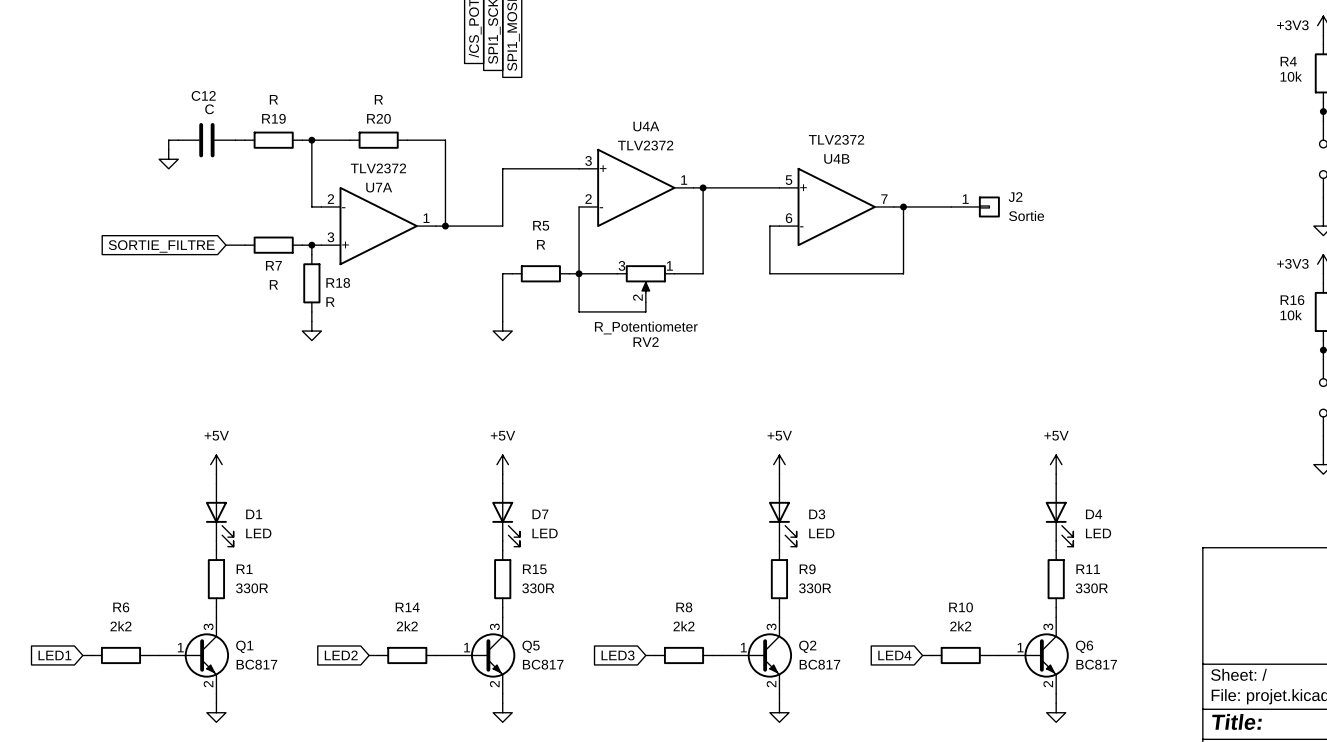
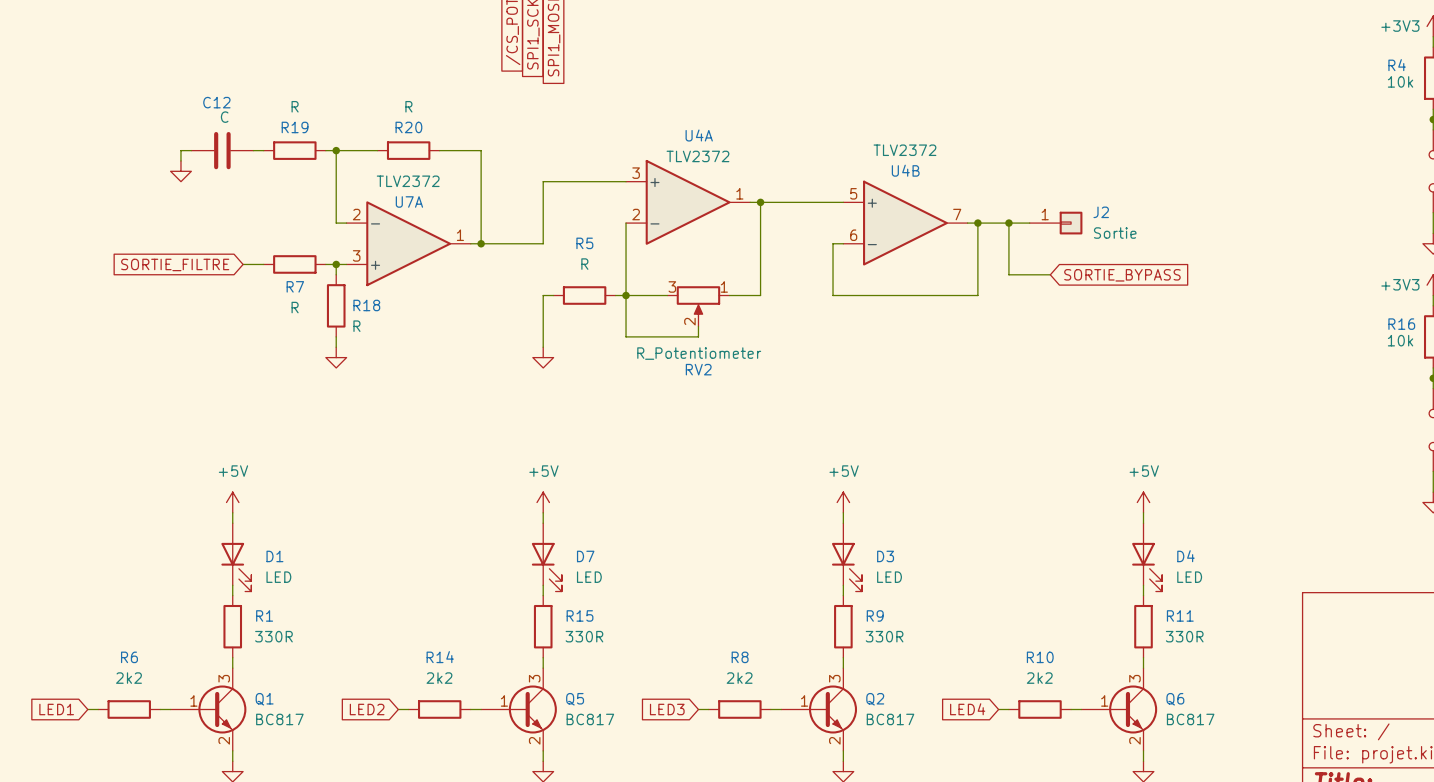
wire: none -> (1008, 223) (1008, 274) (1050, 274)
junction: none -> (1008, 223)
global label: none -> SORTIE_BYPASS (1122, 275)

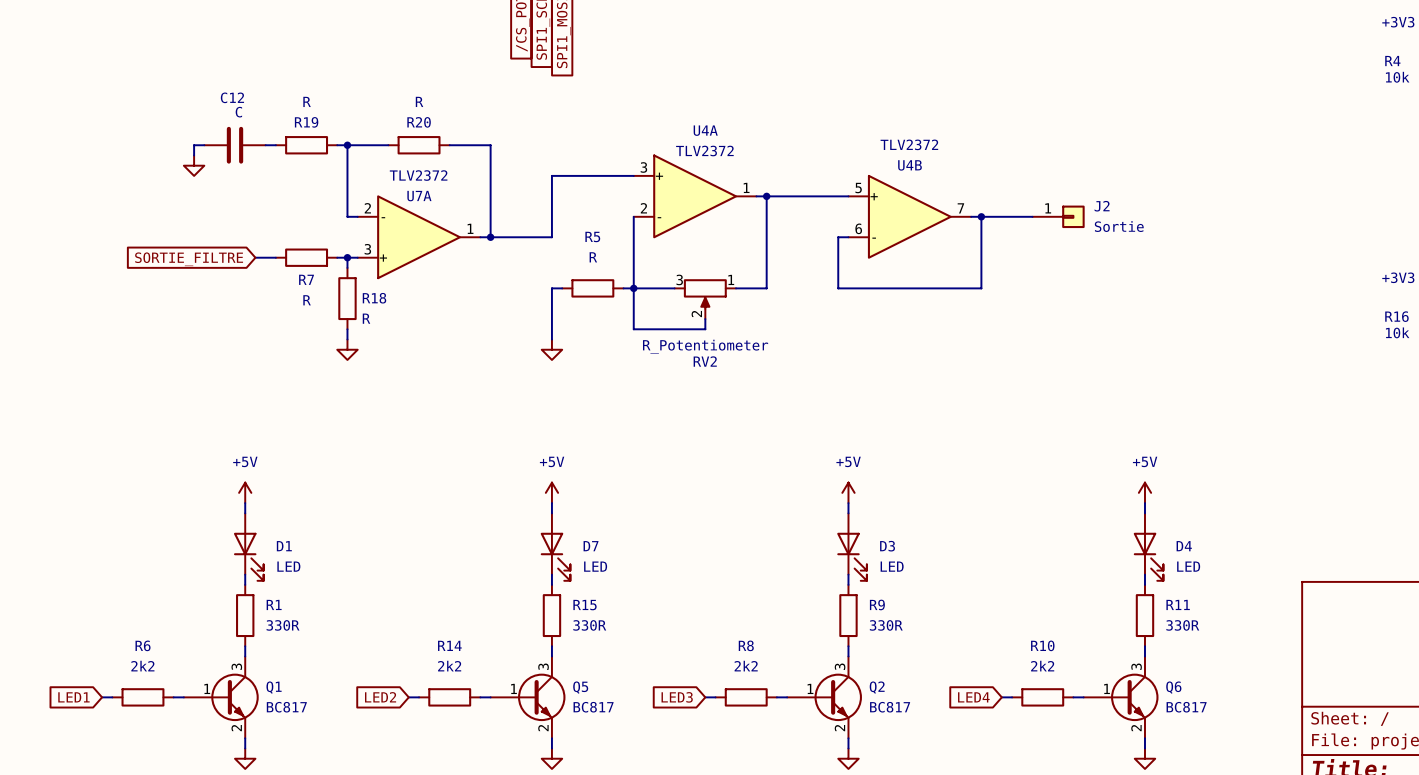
wire: (1008, 223) (1008, 274) (1050, 274) -> none
junction: (1008, 223) -> none
global label: SORTIE_BYPASS (1122, 275) -> none

